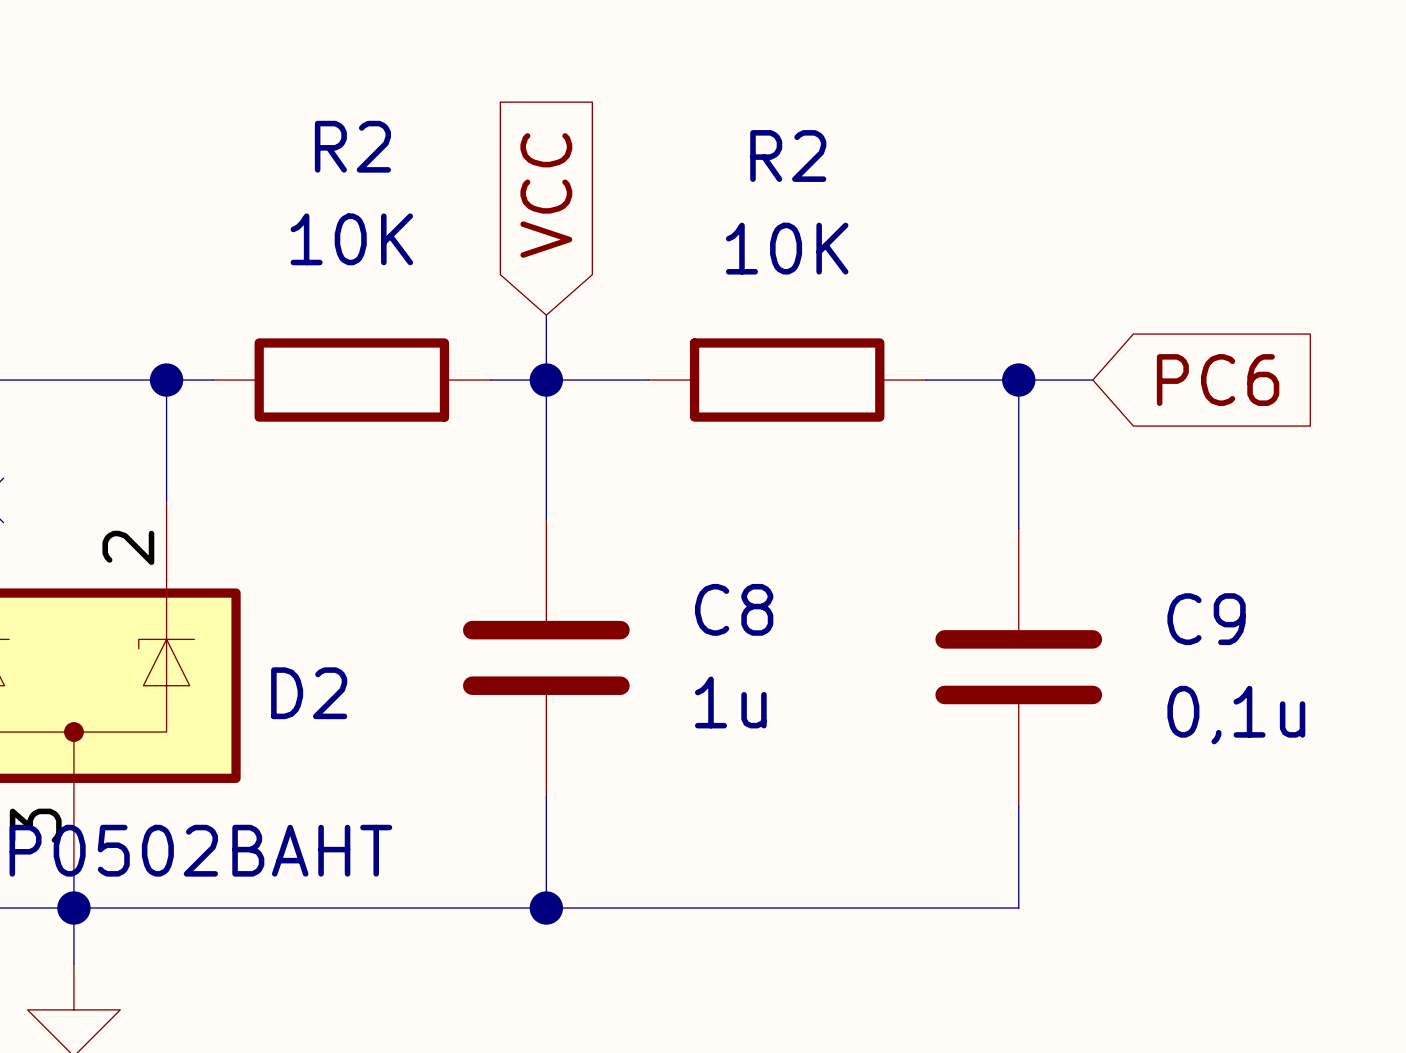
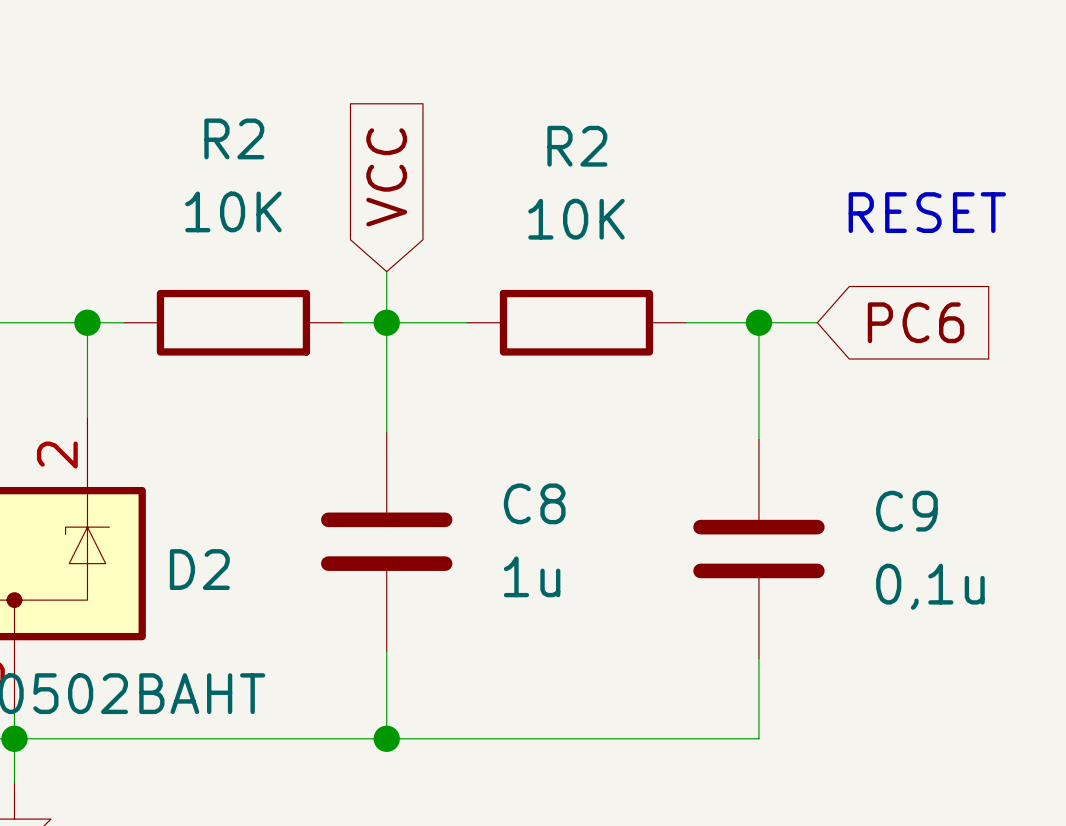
text: none -> RESET (927, 212)

